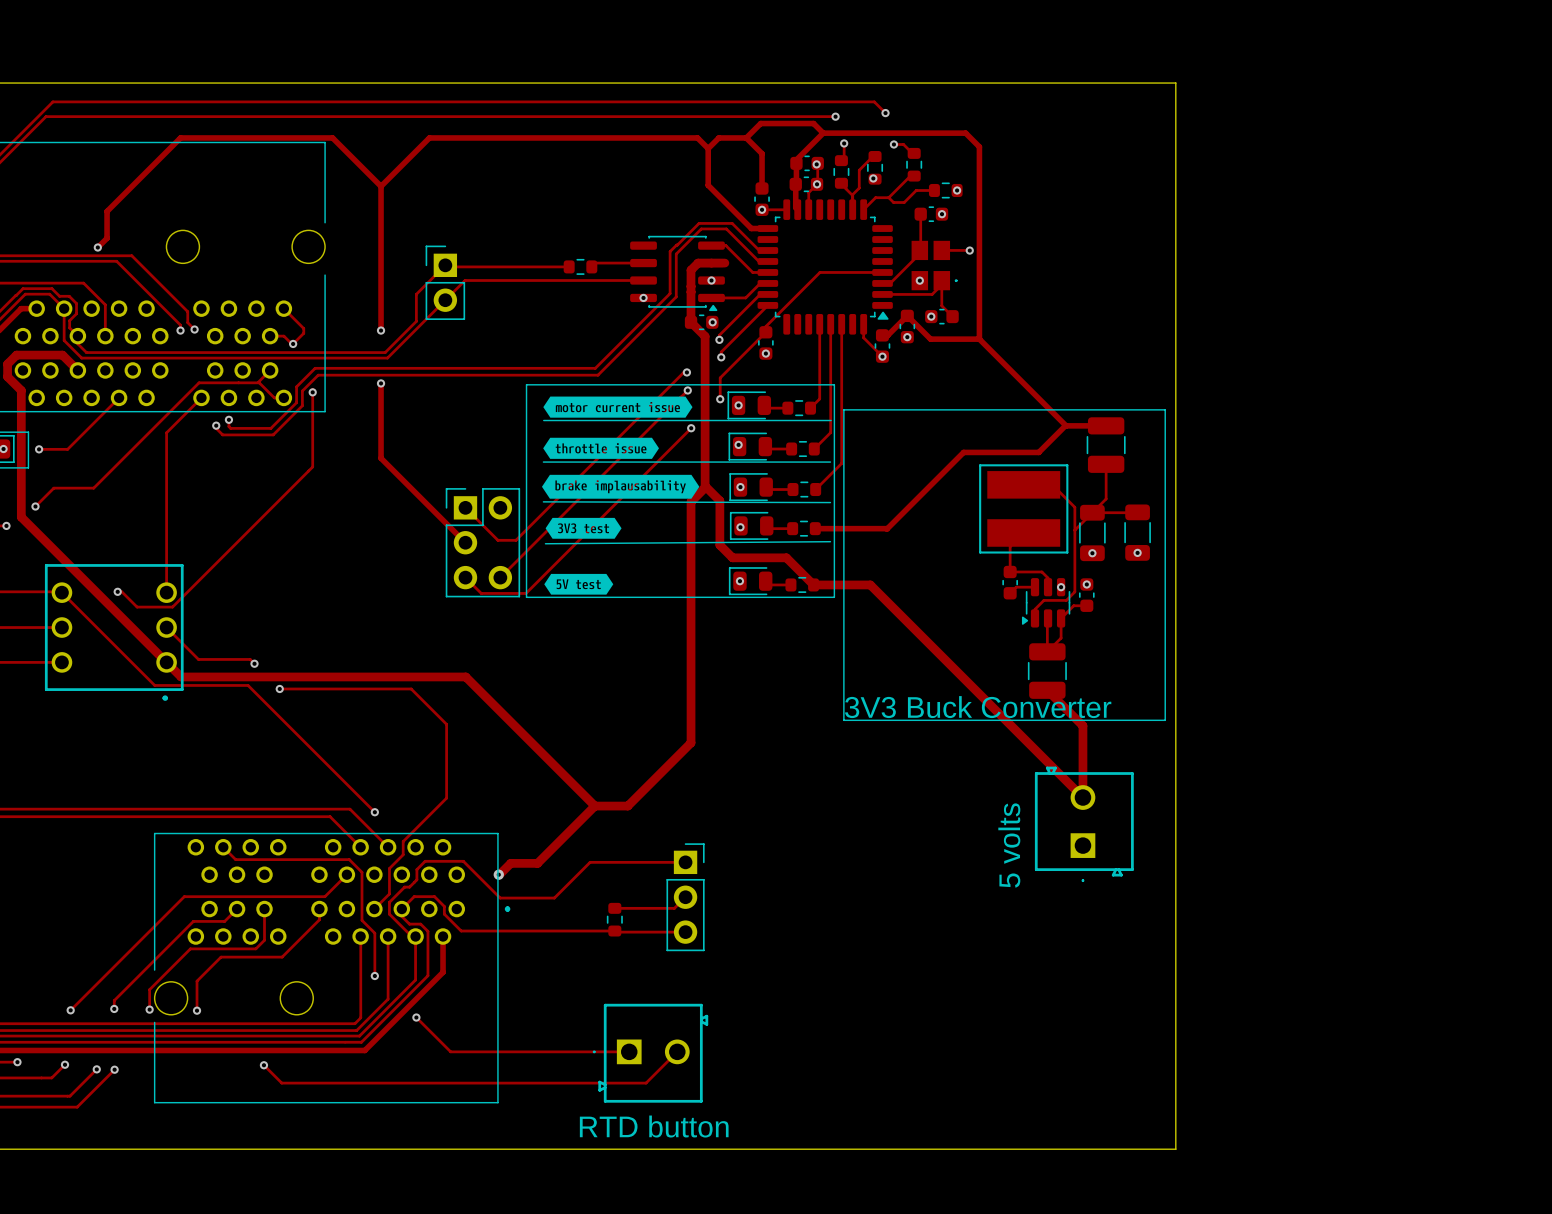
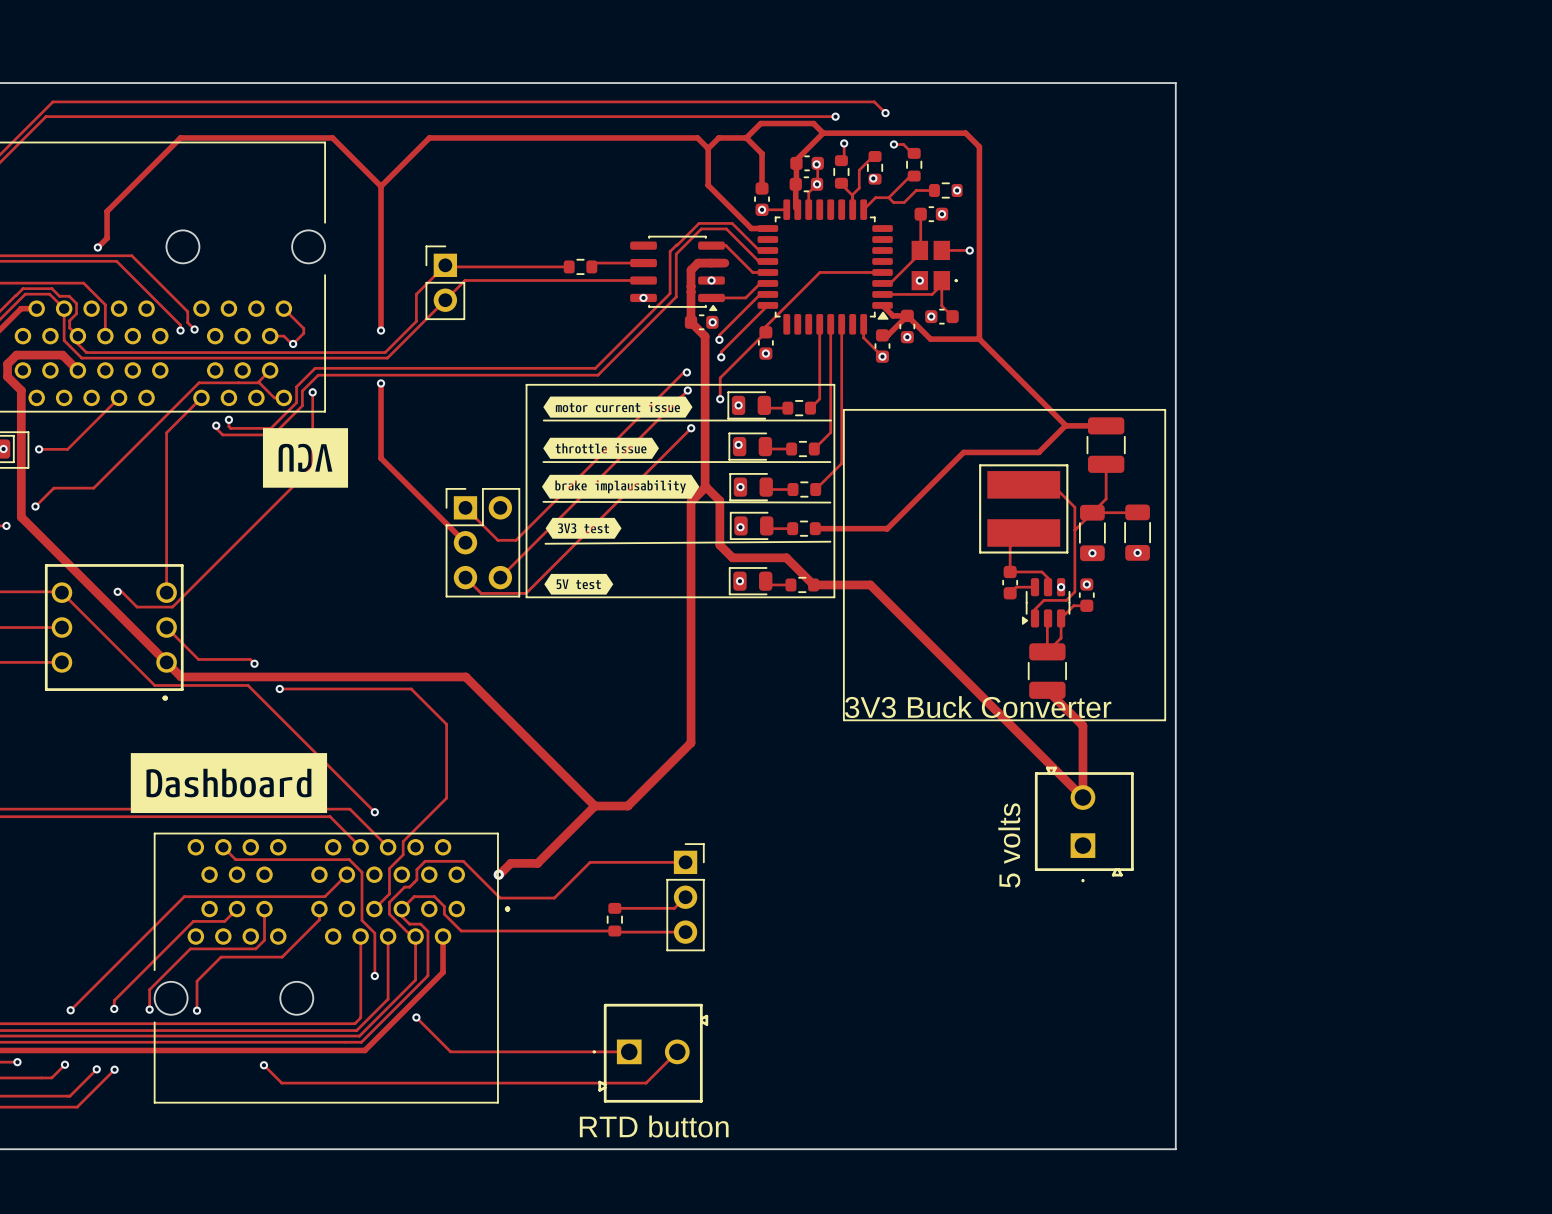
track: none -> (882, 305) (892, 315) (907, 315)
drawing: none -> [262, 428, 349, 488]
drawing: none -> [130, 753, 328, 814]

